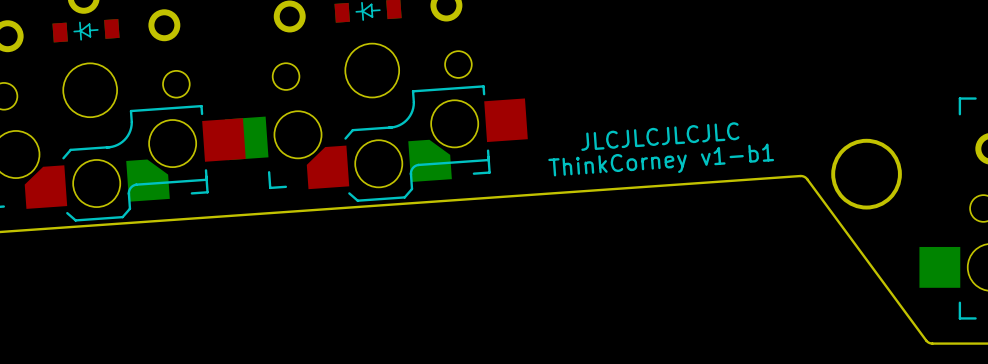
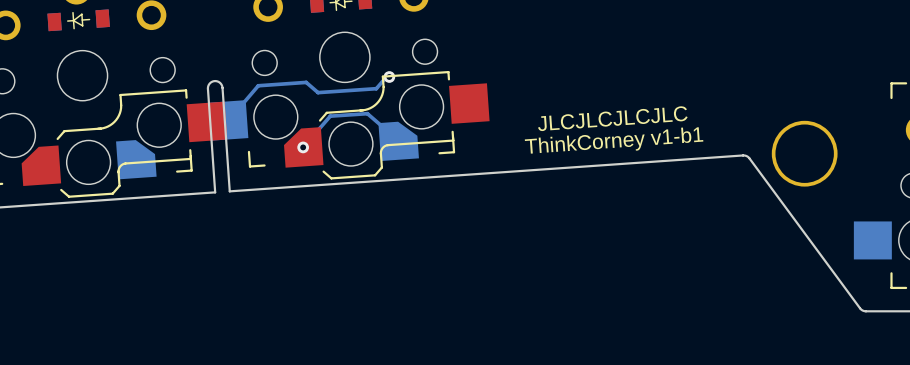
bottom track: none -> (389, 77) (386, 77) (376, 88) (318, 92) (306, 82) (258, 85) (242, 104)
via: none -> (389, 77)
bottom track: none -> (398, 140) (367, 113) (330, 116) (303, 147)
via: none -> (303, 147)
board edge: (248, 214) (232, 215) -> (229, 191) (222, 86) (220, 82) (214, 81) (209, 83) (207, 87) (215, 192)

